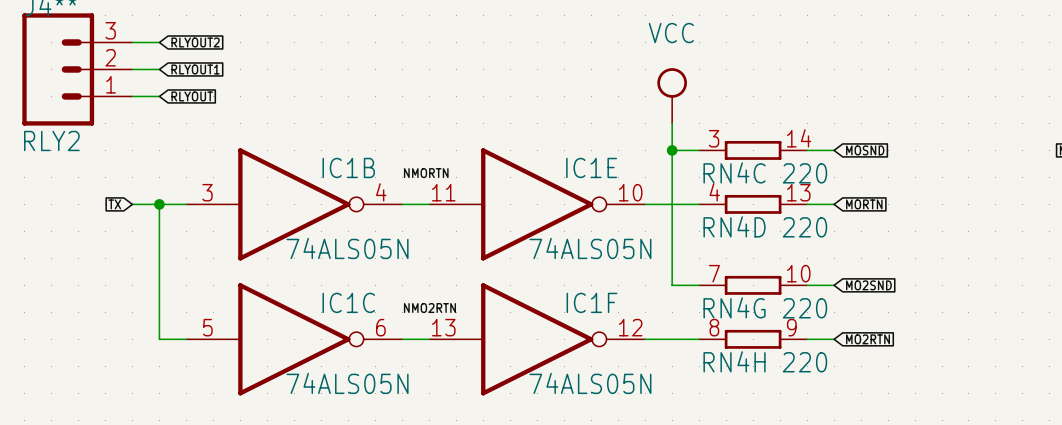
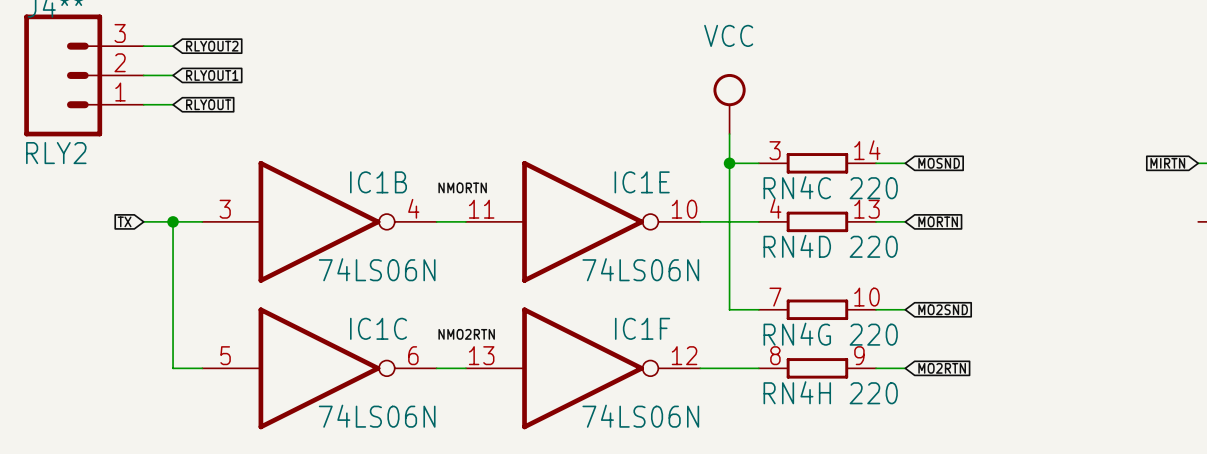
IC1B value: 74ALS05N (347, 248) -> 74LS06N (377, 269)
IC1E value: 74ALS05N (590, 248) -> 74LS06N (640, 269)
IC1C value: 74ALS05N (347, 383) -> 74LS06N (377, 416)
IC1F value: 74ALS05N (590, 383) -> 74LS06N (640, 416)

